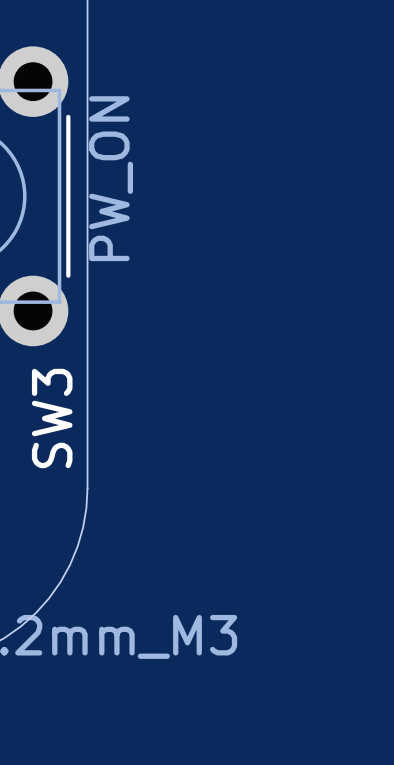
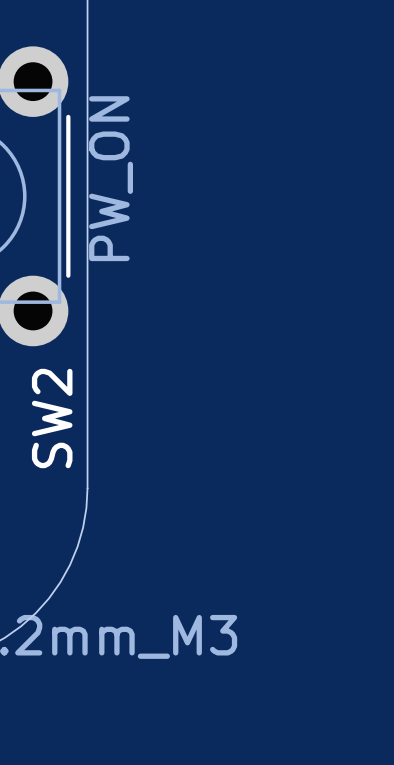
SW3 name: SW3 (52, 418) -> SW2 (52, 418)

